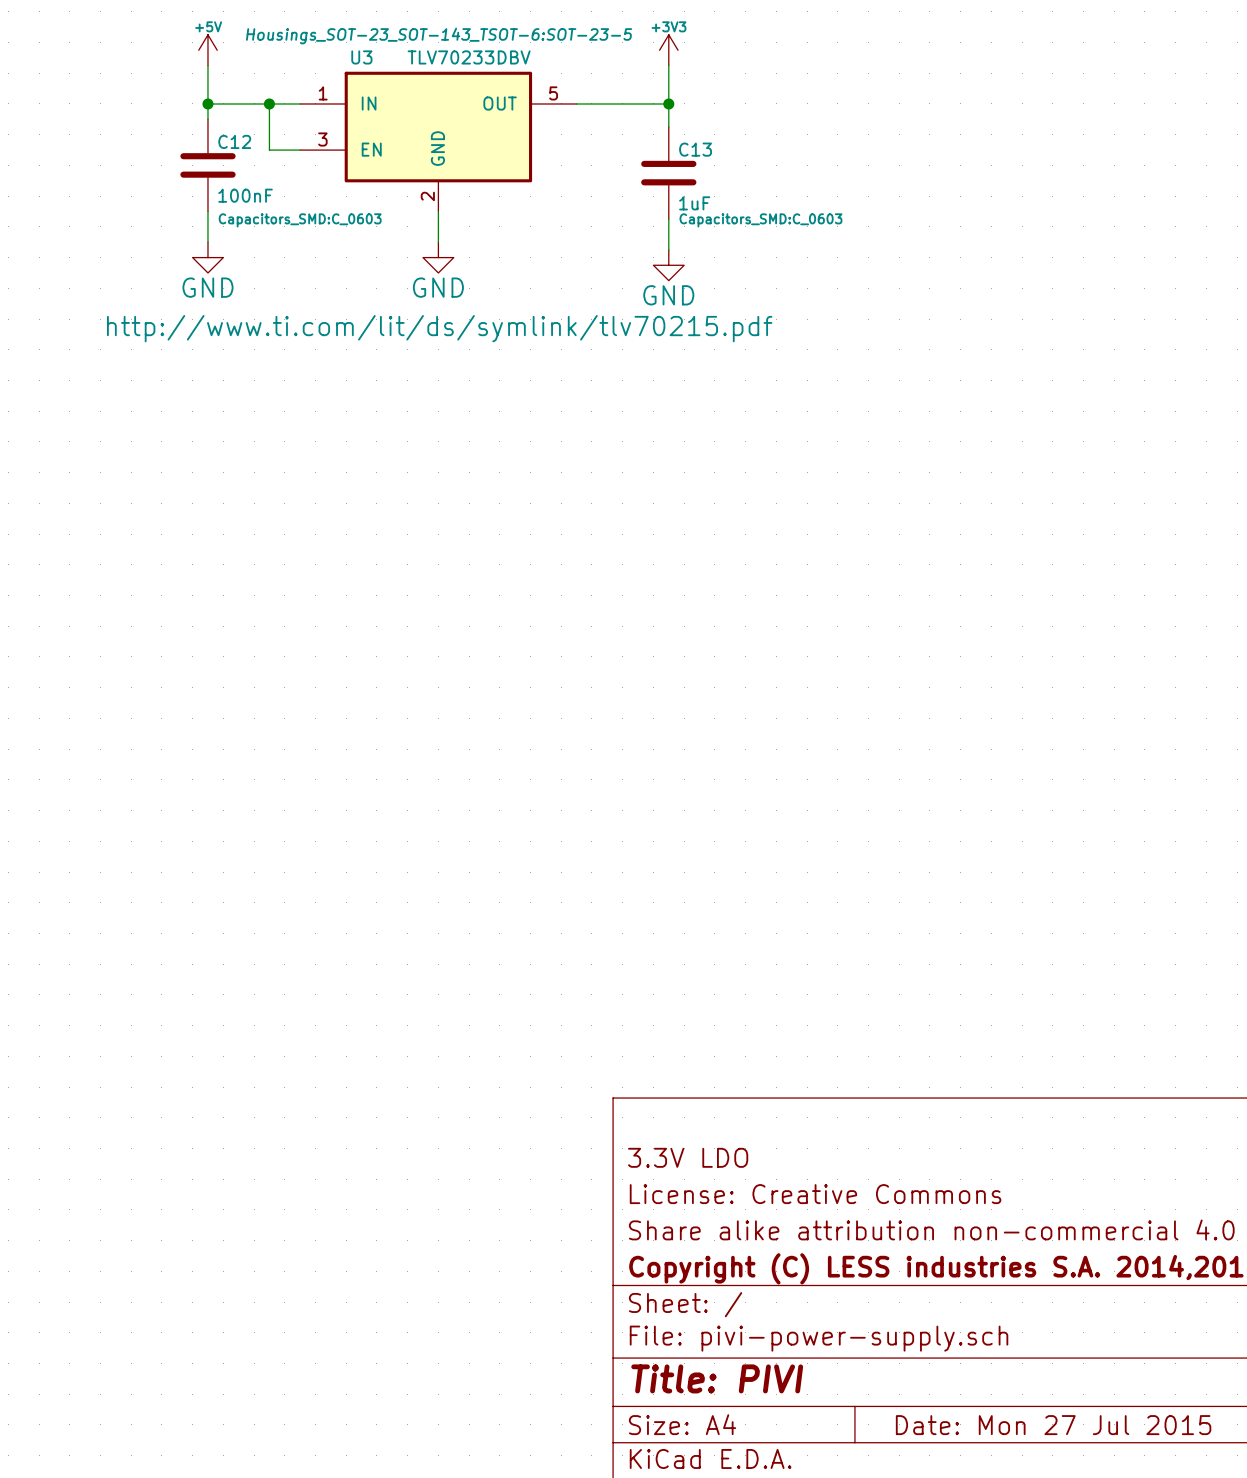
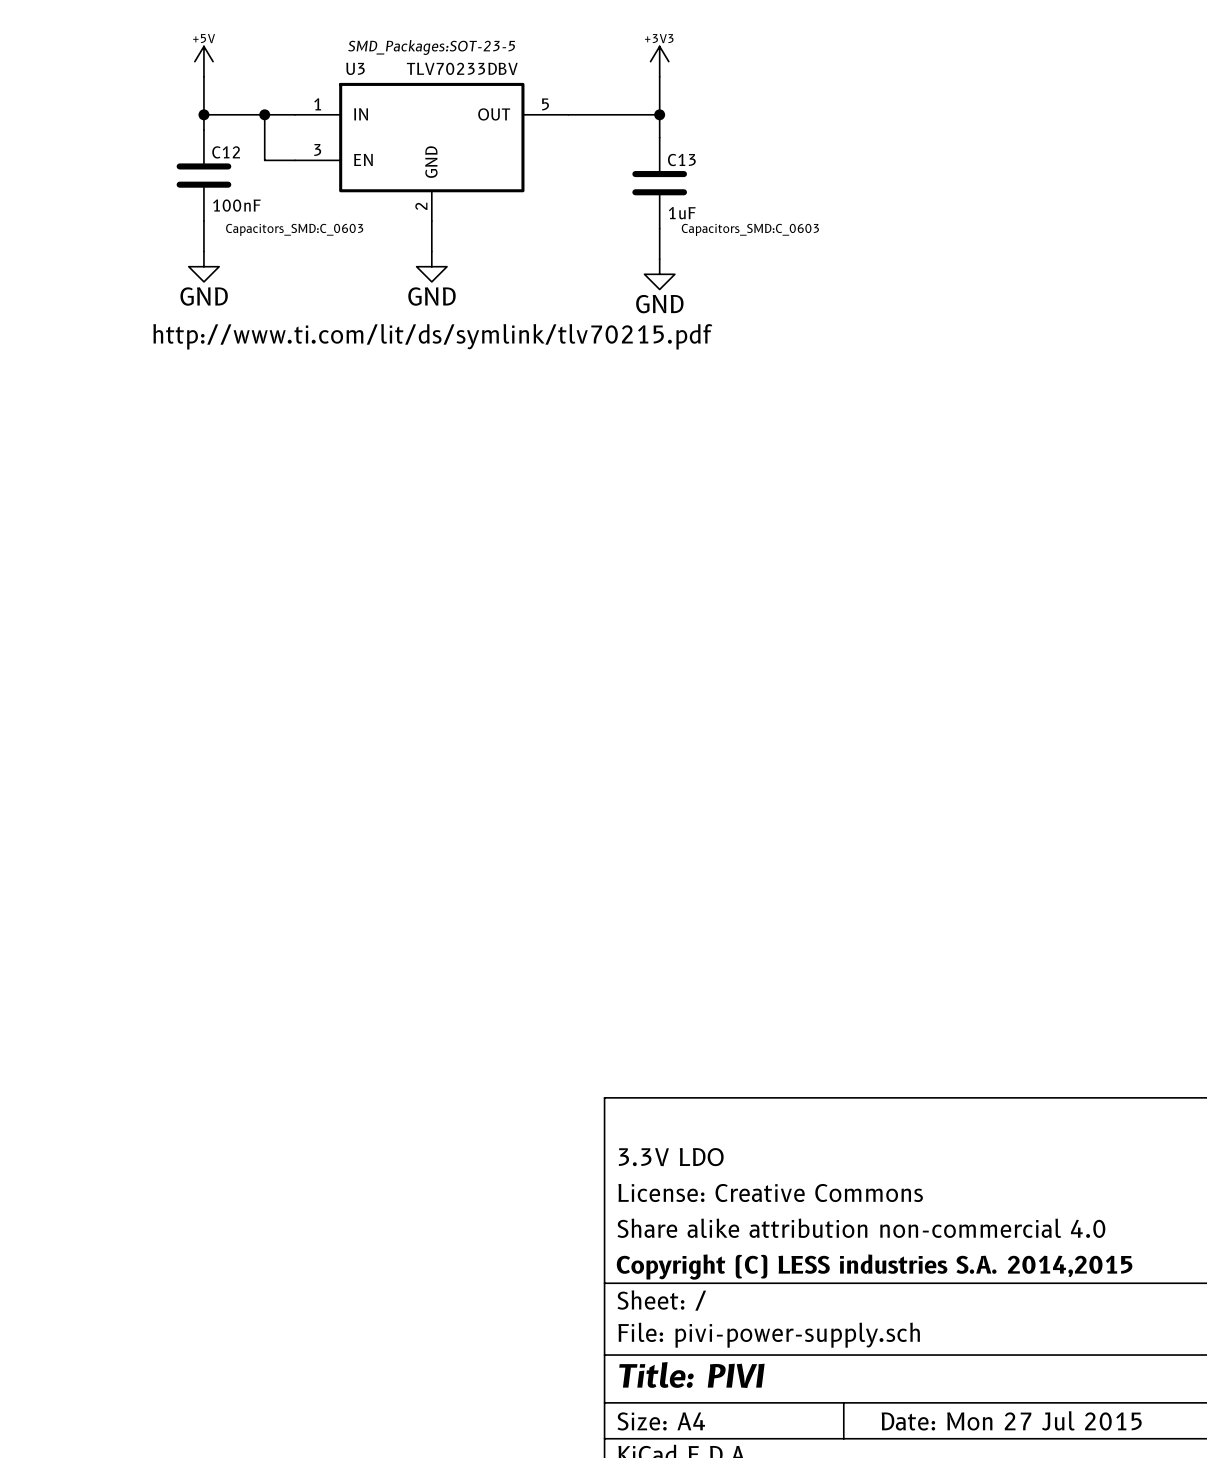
U3 text: Housings_SOT-23_SOT-143_TSOT-6:SOT-23-5 (439, 36) -> SMD_Packages:SOT-23-5 (431, 47)

